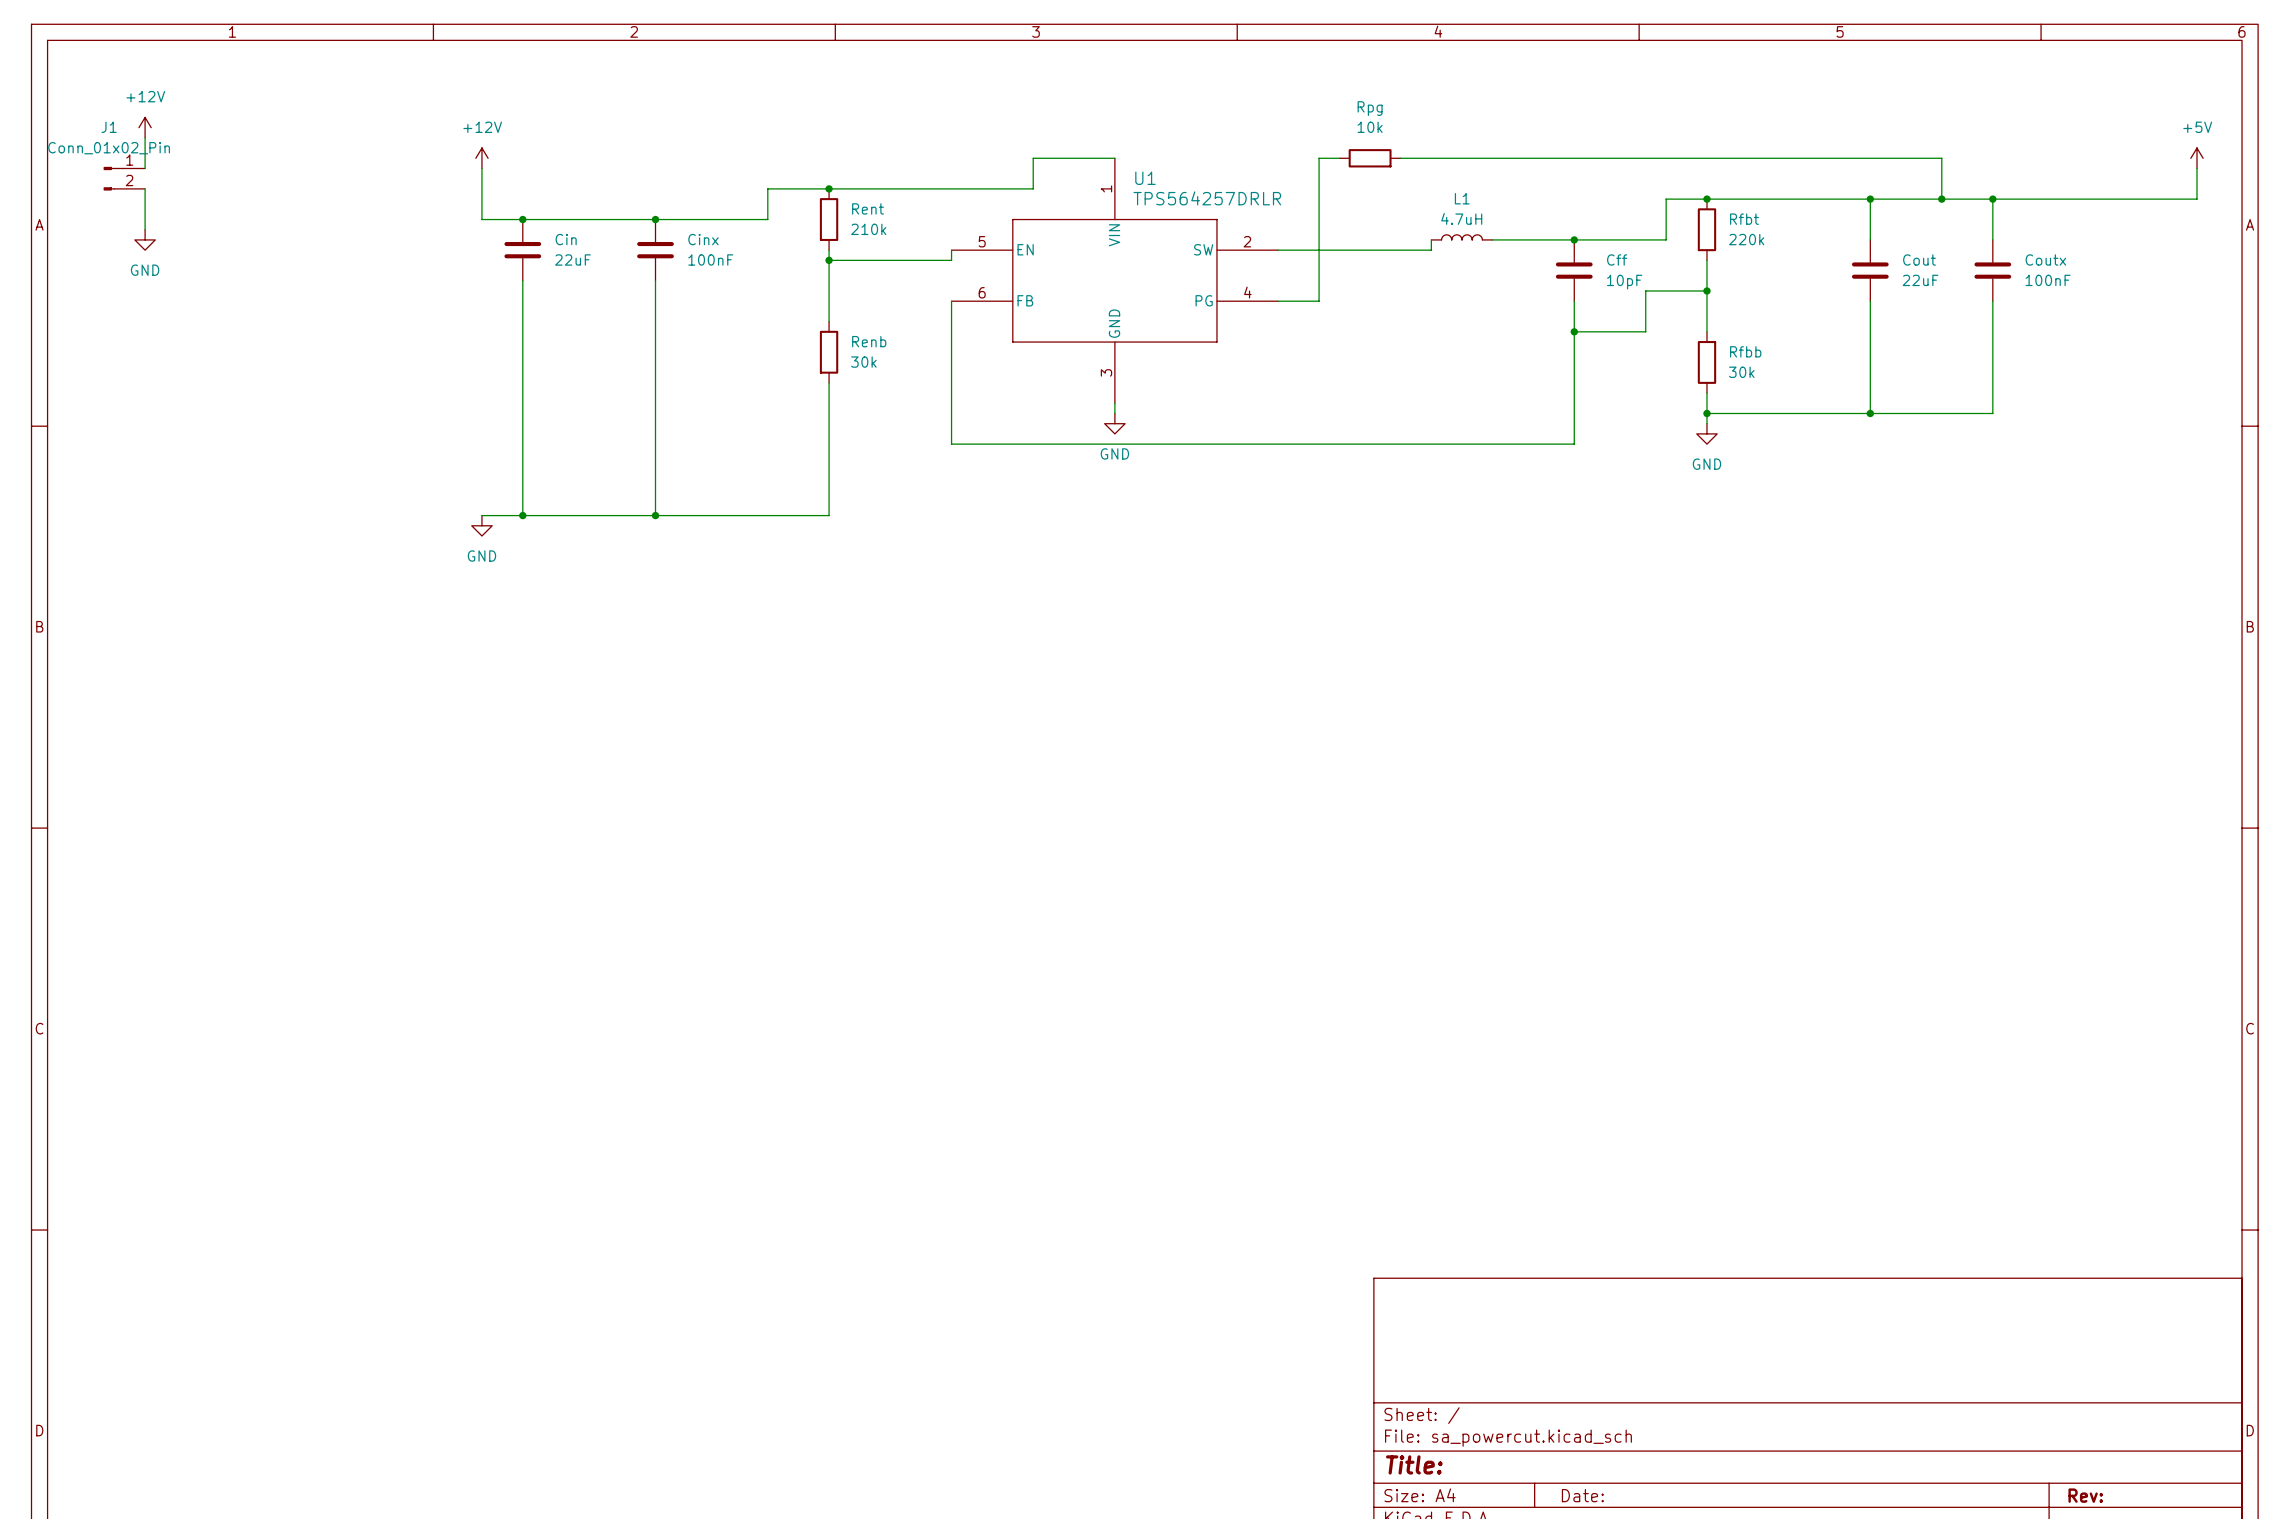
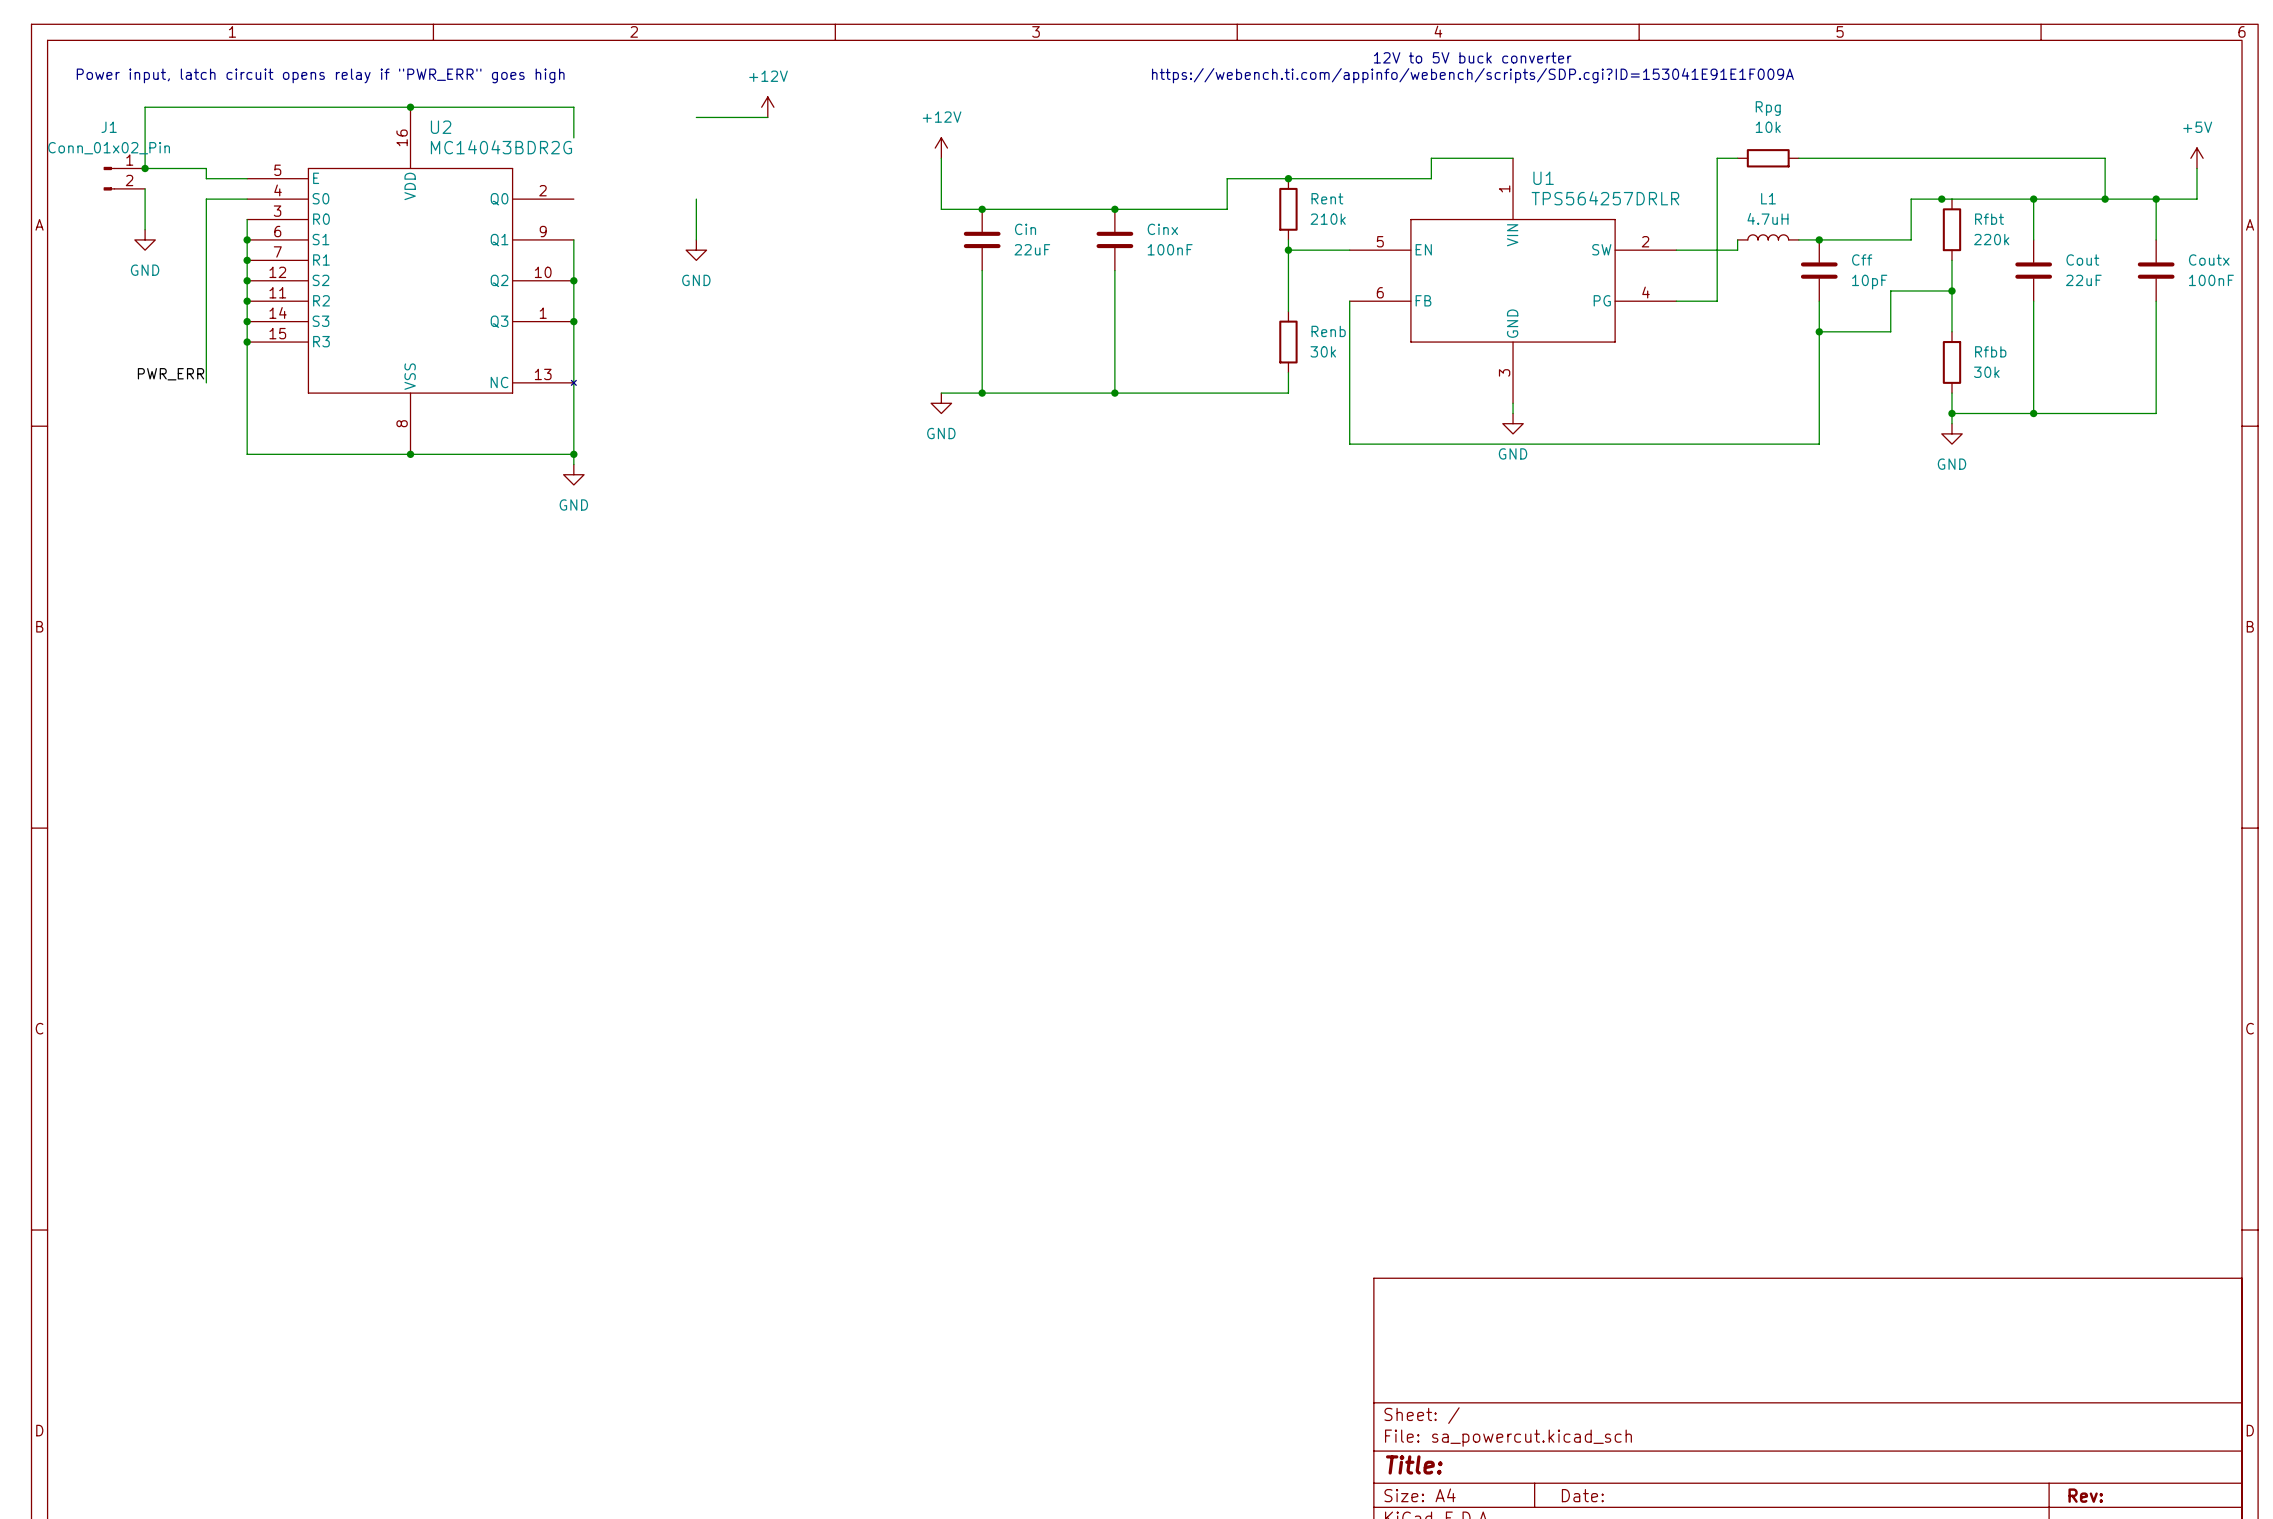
text: none -> 12V to 5V buck converter (1472, 57)
text: none -> Power input, latch circuit opens relay if "PWR_ERR" goes high (320, 75)
text: none -> https://webench.ti.com/appinfo/webench/scripts/SDP.cgi?ID=153041E91E1F009A (1472, 75)
junction: none -> (410, 107)
power symbol: none -> +12V (767, 107)
wire: none -> (696, 117) (767, 117)
power symbol: +12V (145, 127) -> none
wire: none -> (145, 137) (145, 107) (573, 107) (573, 137)
power symbol: none -> +12V (941, 148)
power symbol: +12V (481, 158) -> none
wire: (1114, 158) (1033, 158) (1033, 188) (767, 188) (767, 219) (481, 219) (481, 168) -> none
wire: (1339, 158) (1319, 158) (1319, 301) (1278, 301) -> none
Rpg: 10k (1370, 158) -> none
wire: (1400, 158) (1431, 158) -> (941, 158) (941, 209) (1227, 209) (1227, 178) (1431, 178) (1431, 158)
wire: (1513, 158) (1717, 158) -> (1676, 301) (1717, 301) (1717, 158)
wire: (1737, 158) (1798, 158) -> none
Rpg: none -> 10k (1768, 158)
wire: (1941, 158) (1941, 199) -> (1941, 158) (2105, 158) (2105, 199)
wire: none -> (145, 168) (206, 168) (206, 178) (247, 178)
junction: none -> (145, 168)
junction: none -> (1288, 178)
junction: (829, 188) -> none
wire: none -> (247, 199) (206, 199) (206, 382)
wire: none -> (696, 199) (696, 239)
junction: (1706, 199) -> none
wire: (1870, 199) (1870, 239) -> (2033, 199) (2033, 239)
junction: (1870, 199) -> none
wire: (1911, 199) (1666, 199) (1666, 239) (1492, 239) -> (1911, 199) (1911, 239) (1798, 239)
wire: (1992, 199) (1992, 239) -> (2156, 199) (2156, 239)
junction position: (1992, 199) -> (2033, 199)
junction: none -> (2105, 199)
junction: none -> (2156, 199)
junction: none -> (982, 209)
junction: none -> (1114, 209)
Rent: none -> 210k (1288, 209)
wire: none -> (247, 219) (247, 454) (573, 454)
junction: (522, 219) -> none
junction: (655, 219) -> none
Rent: 210k (829, 219) -> none
Rfbt: 220k (1706, 229) -> none
Rfbt: none -> 220k (1951, 229)
L1 position: (1461, 237) -> (1768, 237)
junction: none -> (247, 239)
wire: none -> (573, 239) (573, 464)
Cin: none -> 22uF (982, 239)
Cinx: none -> 100nF (1114, 239)
wire: none -> (1288, 239) (1288, 311)
junction: (1574, 239) -> none
wire: none -> (1737, 239) (1737, 250) (1676, 250)
junction: none -> (1819, 239)
Cin: 22uF (522, 250) -> none
Cinx: 100nF (655, 250) -> none
power symbol: none -> GND (696, 250)
wire: (829, 250) (829, 321) -> none
wire: (951, 250) (951, 260) (829, 260) -> none
wire: (1278, 250) (1288, 250) -> none
junction: none -> (1288, 250)
junction: none -> (247, 260)
junction: (829, 260) -> none
wire: (1706, 260) (1706, 331) -> none
wire: none -> (1951, 260) (1951, 331)
wire: none -> (982, 270) (982, 393)
wire: none -> (1114, 270) (1114, 393)
Cff: 10pF (1574, 270) -> none
Cff: none -> 10pF (1819, 270)
Cout position: (1870, 270) -> (2033, 270)
Coutx position: (1992, 270) -> (2156, 270)
junction: none -> (247, 280)
U2: none -> MC14043BDR2G (411, 280)
wire: (522, 280) (522, 515) -> none
junction: none -> (573, 280)
wire: (655, 280) (655, 515) -> none
U1 position: (1114, 280) -> (1513, 280)
wire: (1706, 290) (1645, 290) (1645, 331) (1574, 331) -> none
junction: (1706, 290) -> none
wire: none -> (1951, 290) (1890, 290) (1890, 331) (1819, 331)
junction: none -> (1951, 290)
junction: none -> (247, 301)
wire: (951, 301) (951, 444) (1349, 444) -> (1349, 301) (1349, 444)
wire: (1574, 301) (1574, 444) -> (1819, 301) (1819, 444) (1574, 444)
wire: (1870, 301) (1870, 413) -> (2033, 301) (2033, 413)
wire: (1992, 301) (1992, 413) -> (2156, 301) (2156, 413) (1992, 413)
junction: none -> (247, 321)
junction: none -> (573, 321)
junction: (1574, 331) -> none
junction: none -> (1819, 331)
junction: none -> (247, 342)
Renb: none -> 30k (1288, 342)
Renb: 30k (829, 352) -> none
Rfbb: 30k (1706, 362) -> none
Rfbb: none -> 30k (1951, 362)
wire: none -> (1288, 372) (1288, 393) (941, 393)
label: none -> PWR_ERR (171, 374)
wire: (829, 382) (829, 515) (481, 515) -> none
junction: none -> (982, 393)
junction: none -> (1114, 393)
wire: (1706, 393) (1706, 423) -> none
wire: none -> (1951, 393) (1951, 423)
wire: (1114, 403) (1114, 413) -> none
wire: none -> (1513, 403) (1513, 413)
wire: (1706, 413) (1951, 413) -> none
junction: (1706, 413) -> none
junction: (1870, 413) -> none
junction: none -> (1951, 413)
junction: none -> (2033, 413)
power symbol position: GND (1114, 423) -> GND (941, 403)
power symbol: none -> GND (1513, 423)
power symbol: GND (1706, 433) -> none
power symbol: none -> GND (1951, 433)
junction: none -> (410, 454)
junction: none -> (573, 454)
junction: (522, 515) -> none
junction: (655, 515) -> none
power symbol position: GND (481, 525) -> GND (573, 474)

